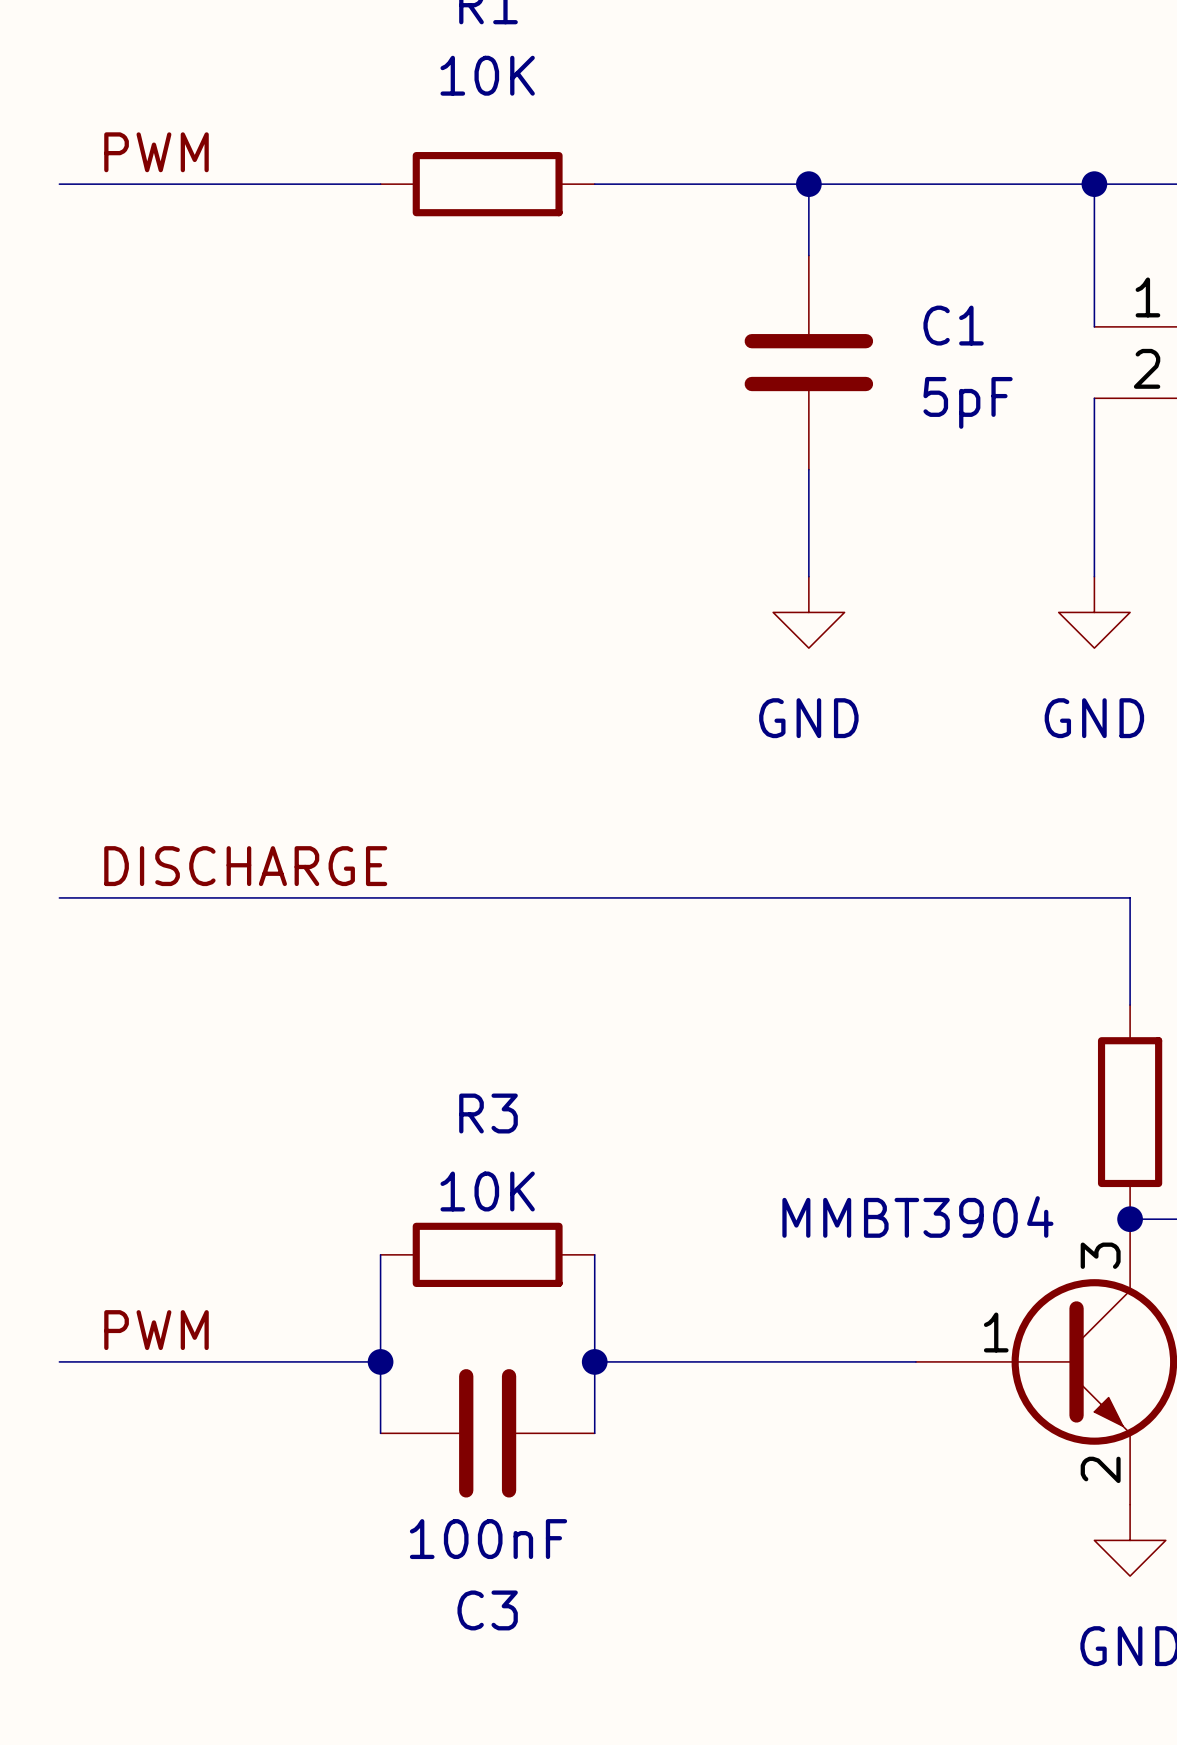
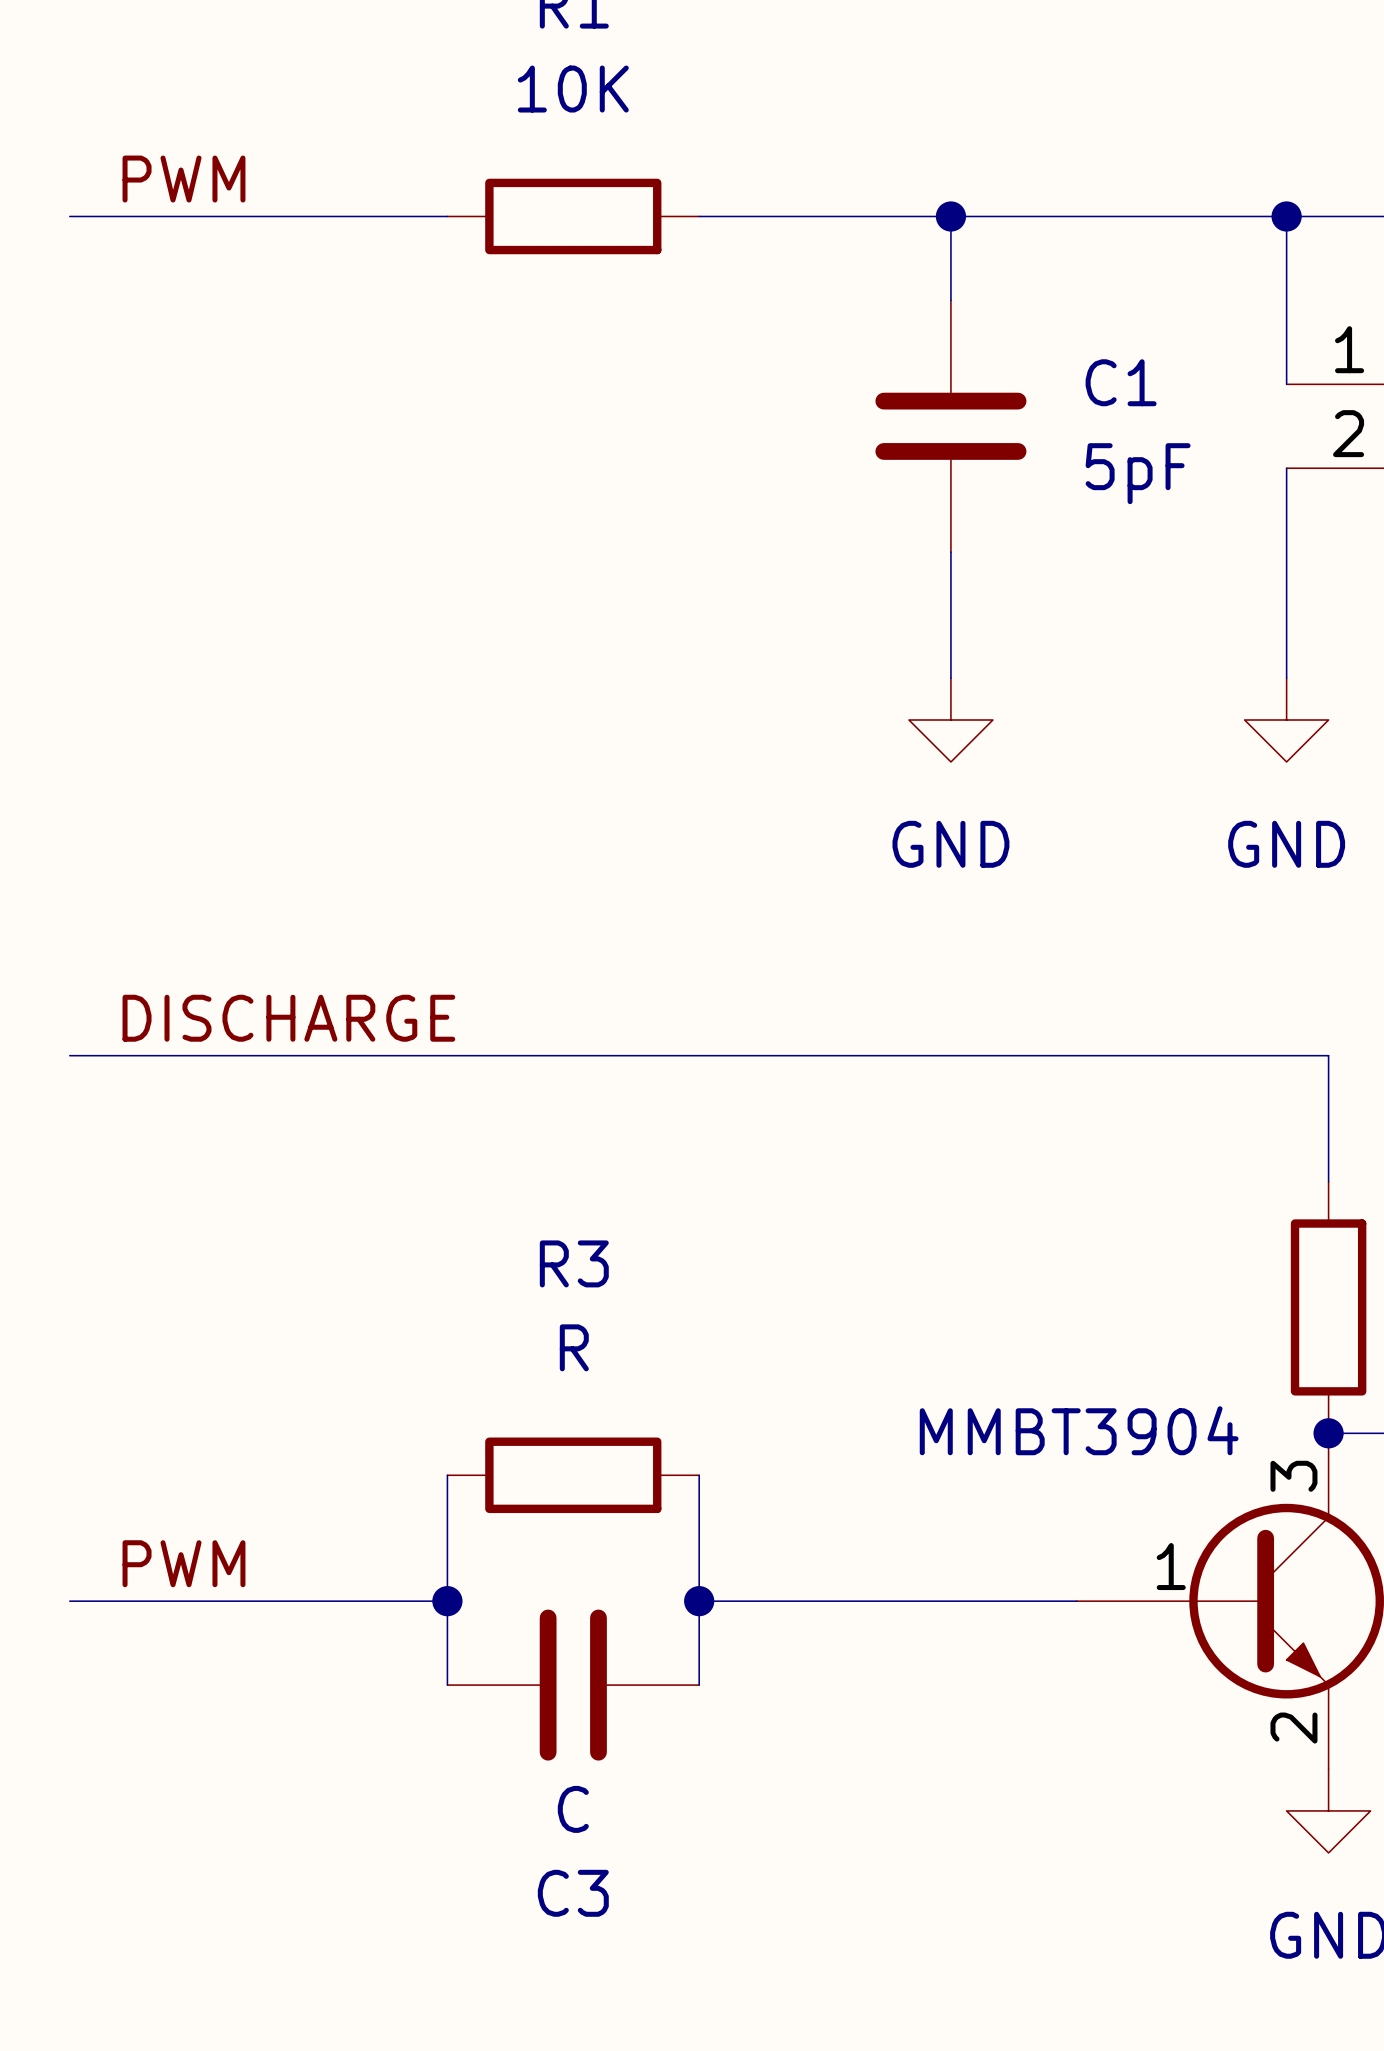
R3 name position: R3 (488, 1113) -> R3 (574, 1263)
R3 value: 10K (487, 1191) -> R (574, 1347)
C3 value: 100nF (488, 1539) -> C (573, 1809)

